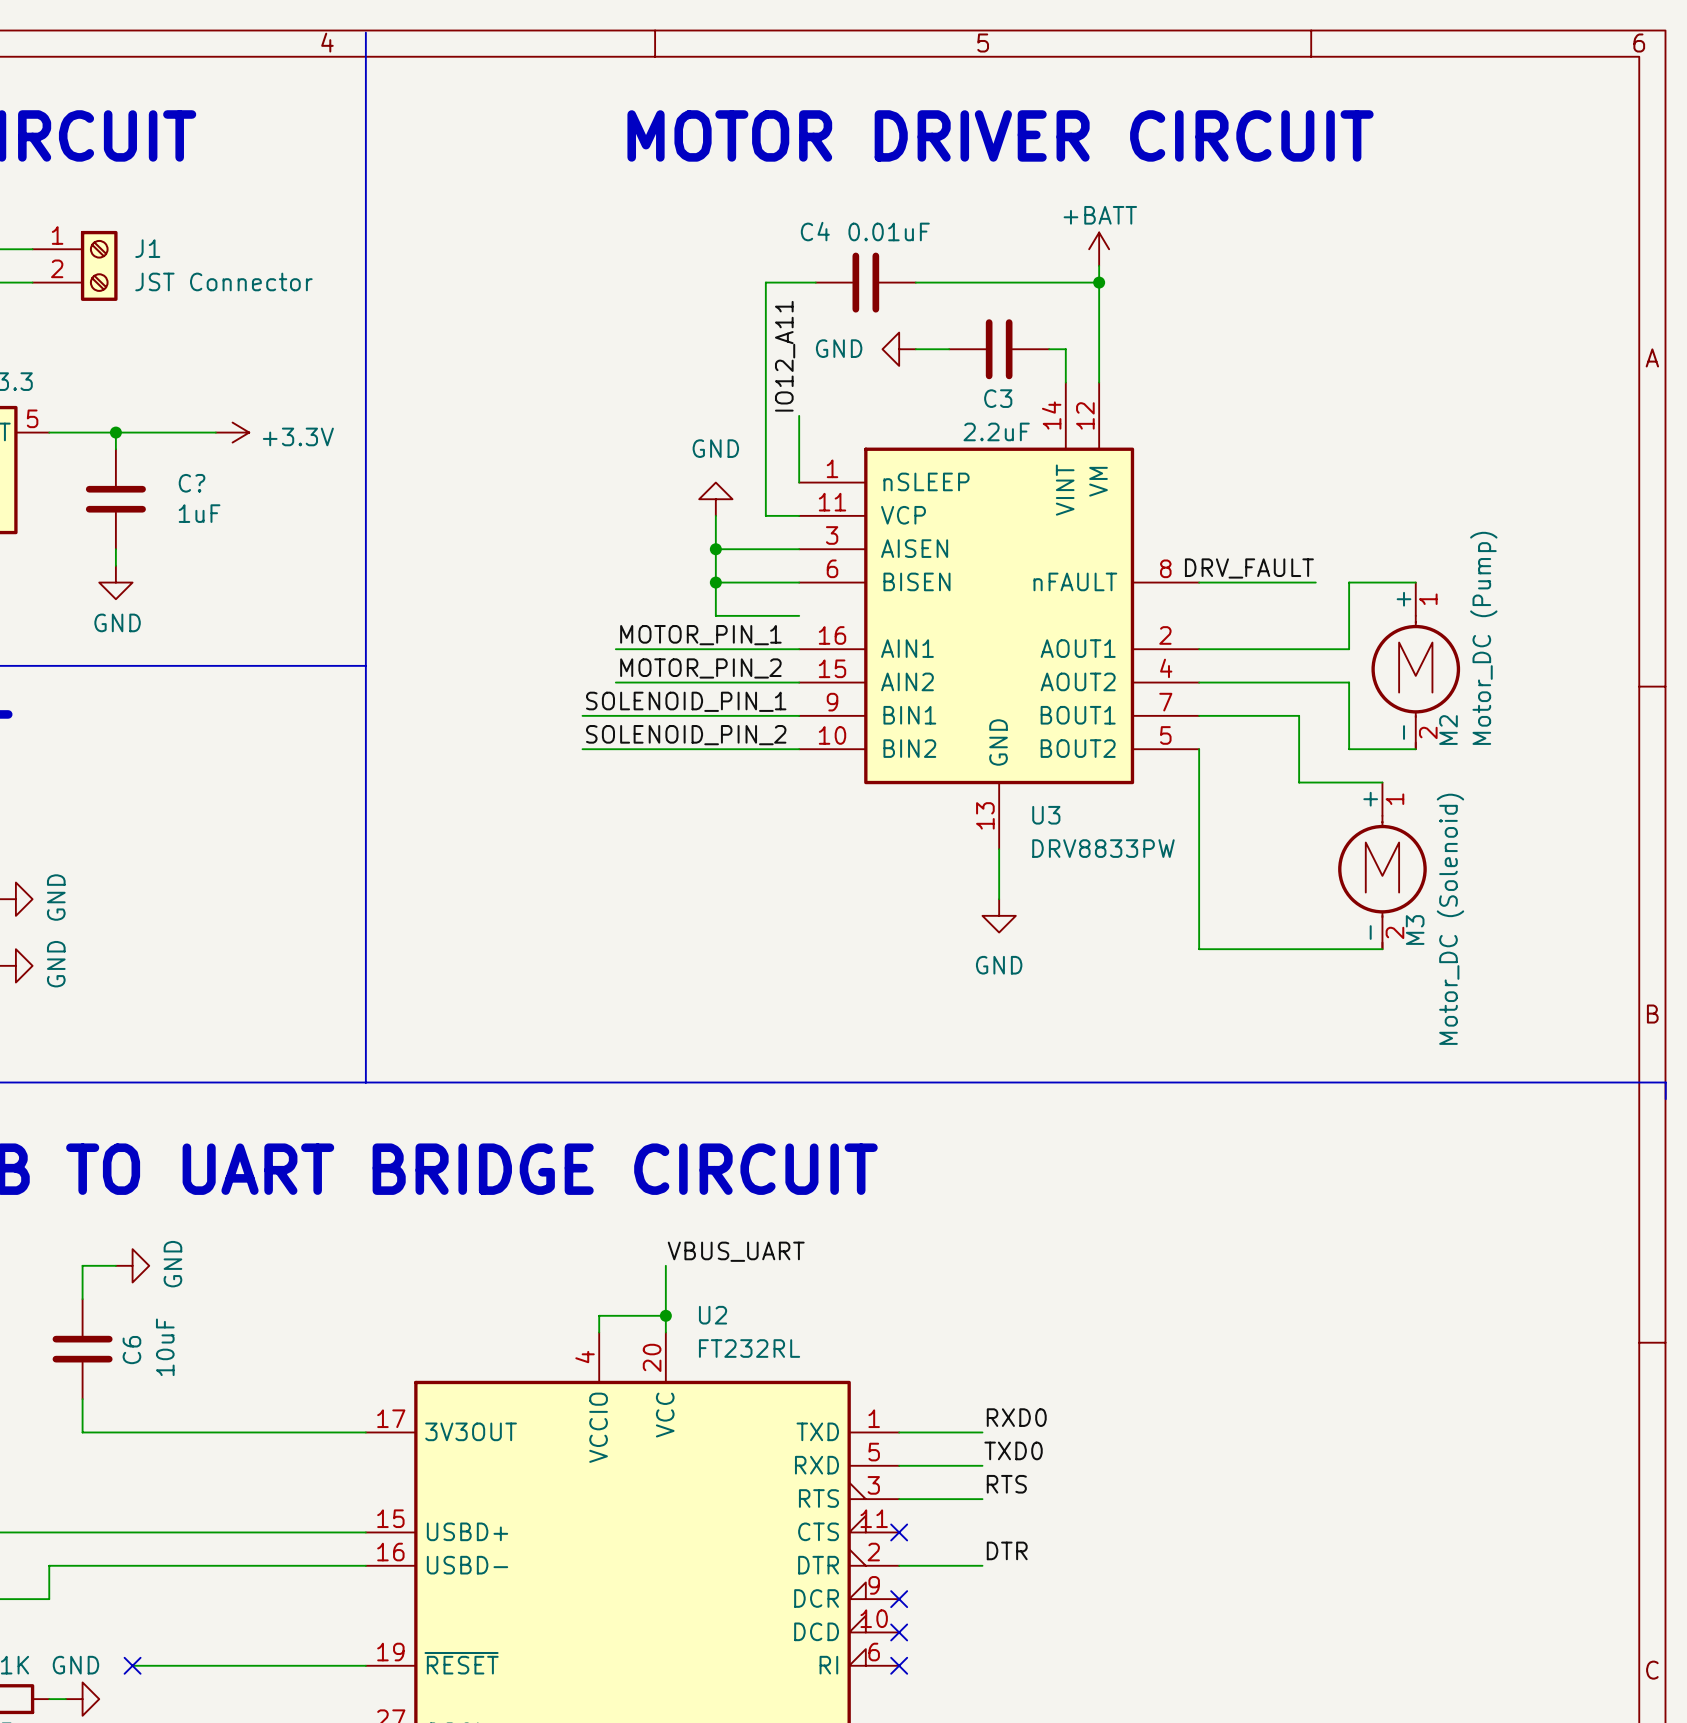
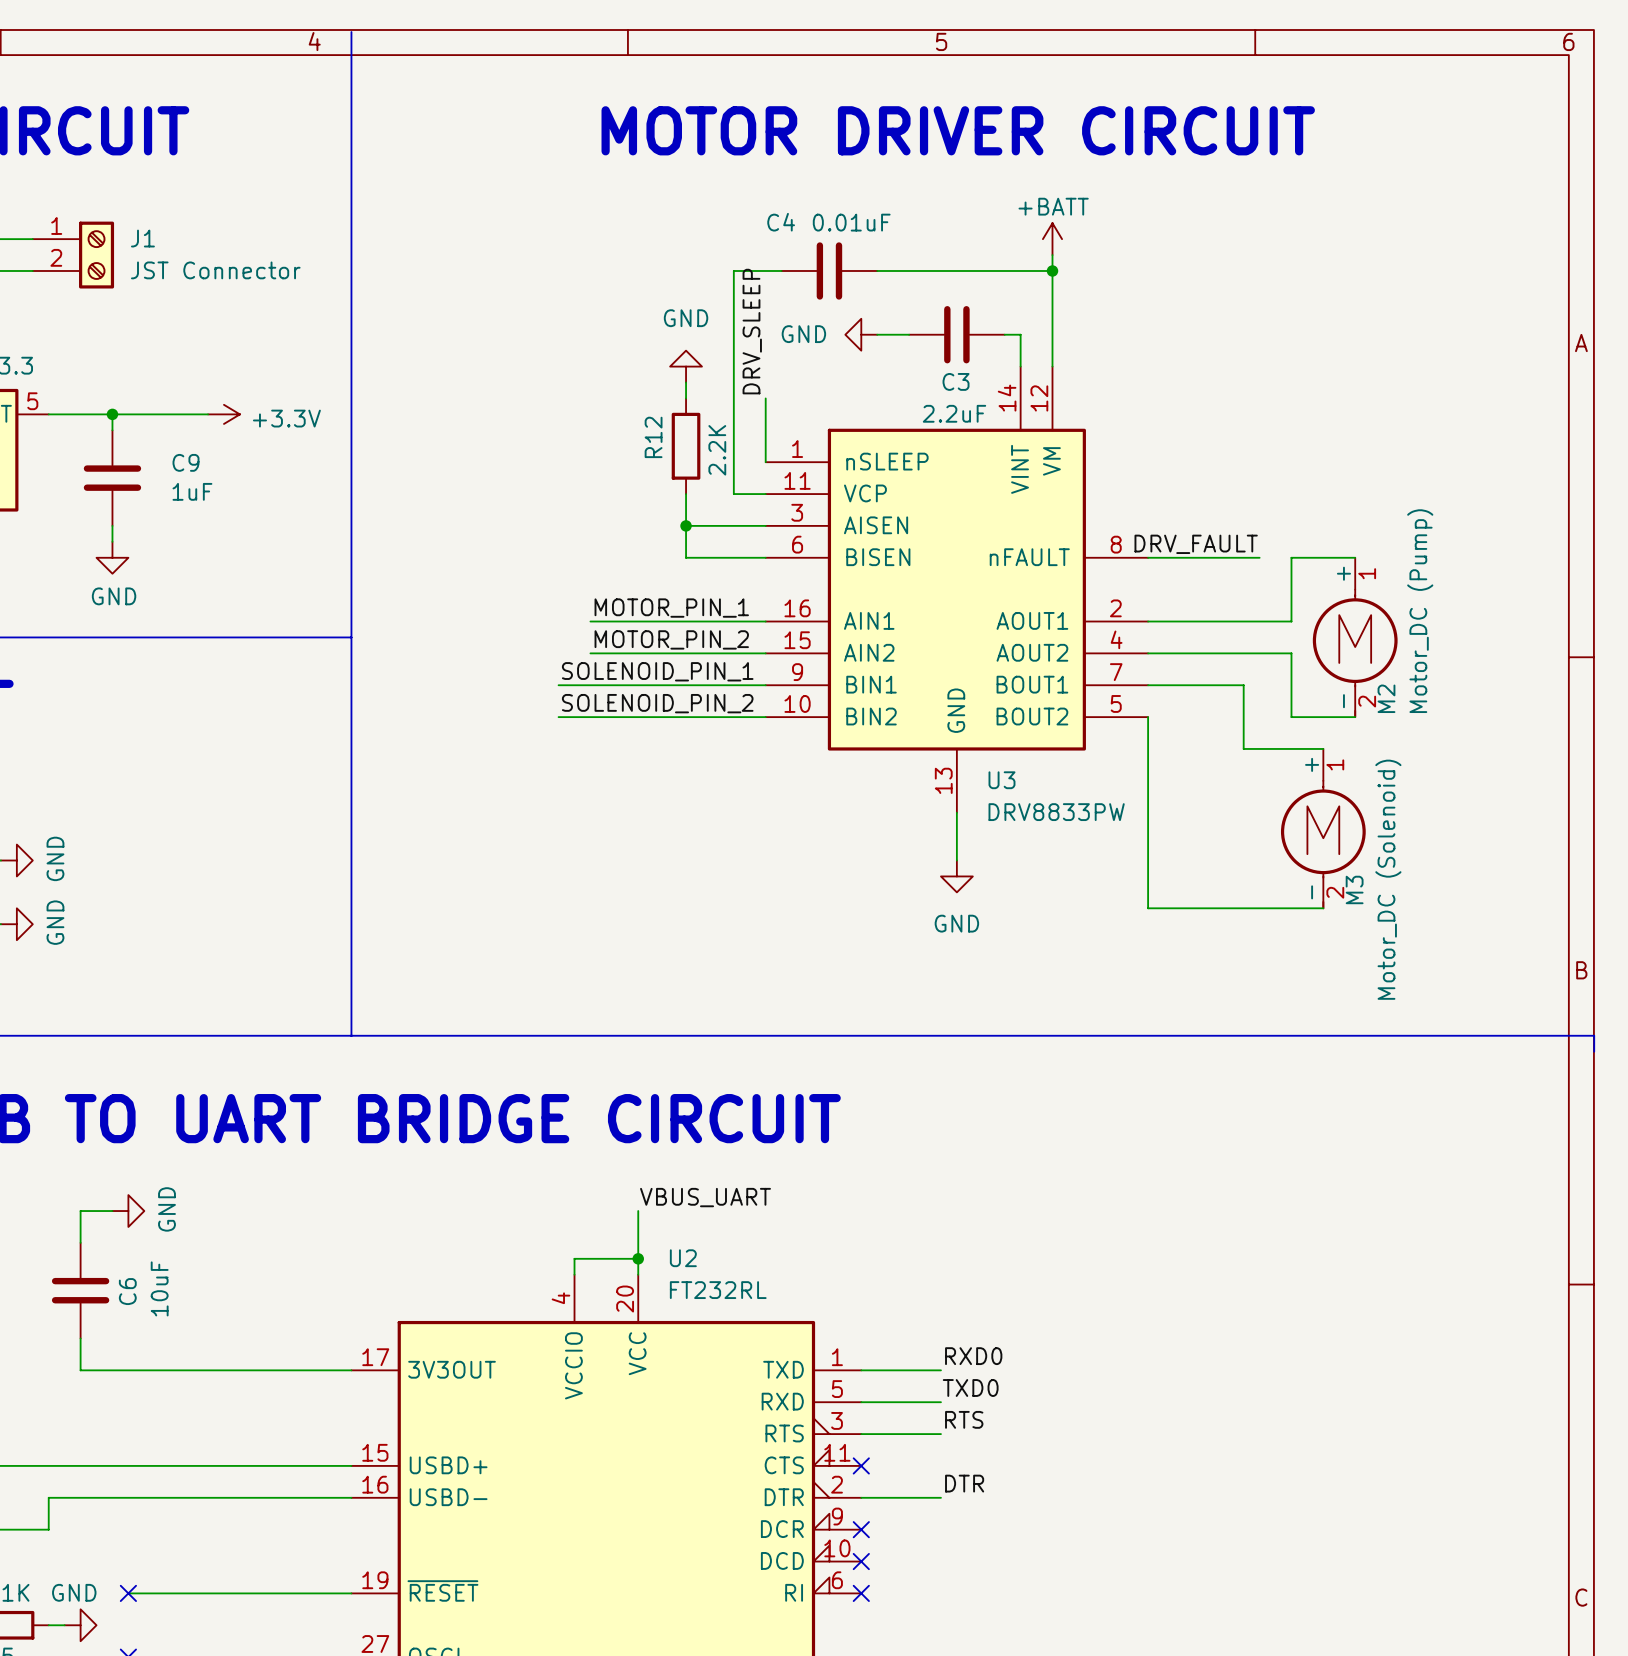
label: IO12_A11 (785, 356) -> DRV_SLEEP (752, 331)
wire: none -> (686, 382) (686, 398)
R12: none -> 2.2K (686, 446)
C? name: C? (192, 483) -> C9 (185, 462)
power symbol position: GND (715, 499) -> GND (686, 366)
wire: (715, 582) (715, 615) (799, 615) -> none
junction: (715, 582) -> none

